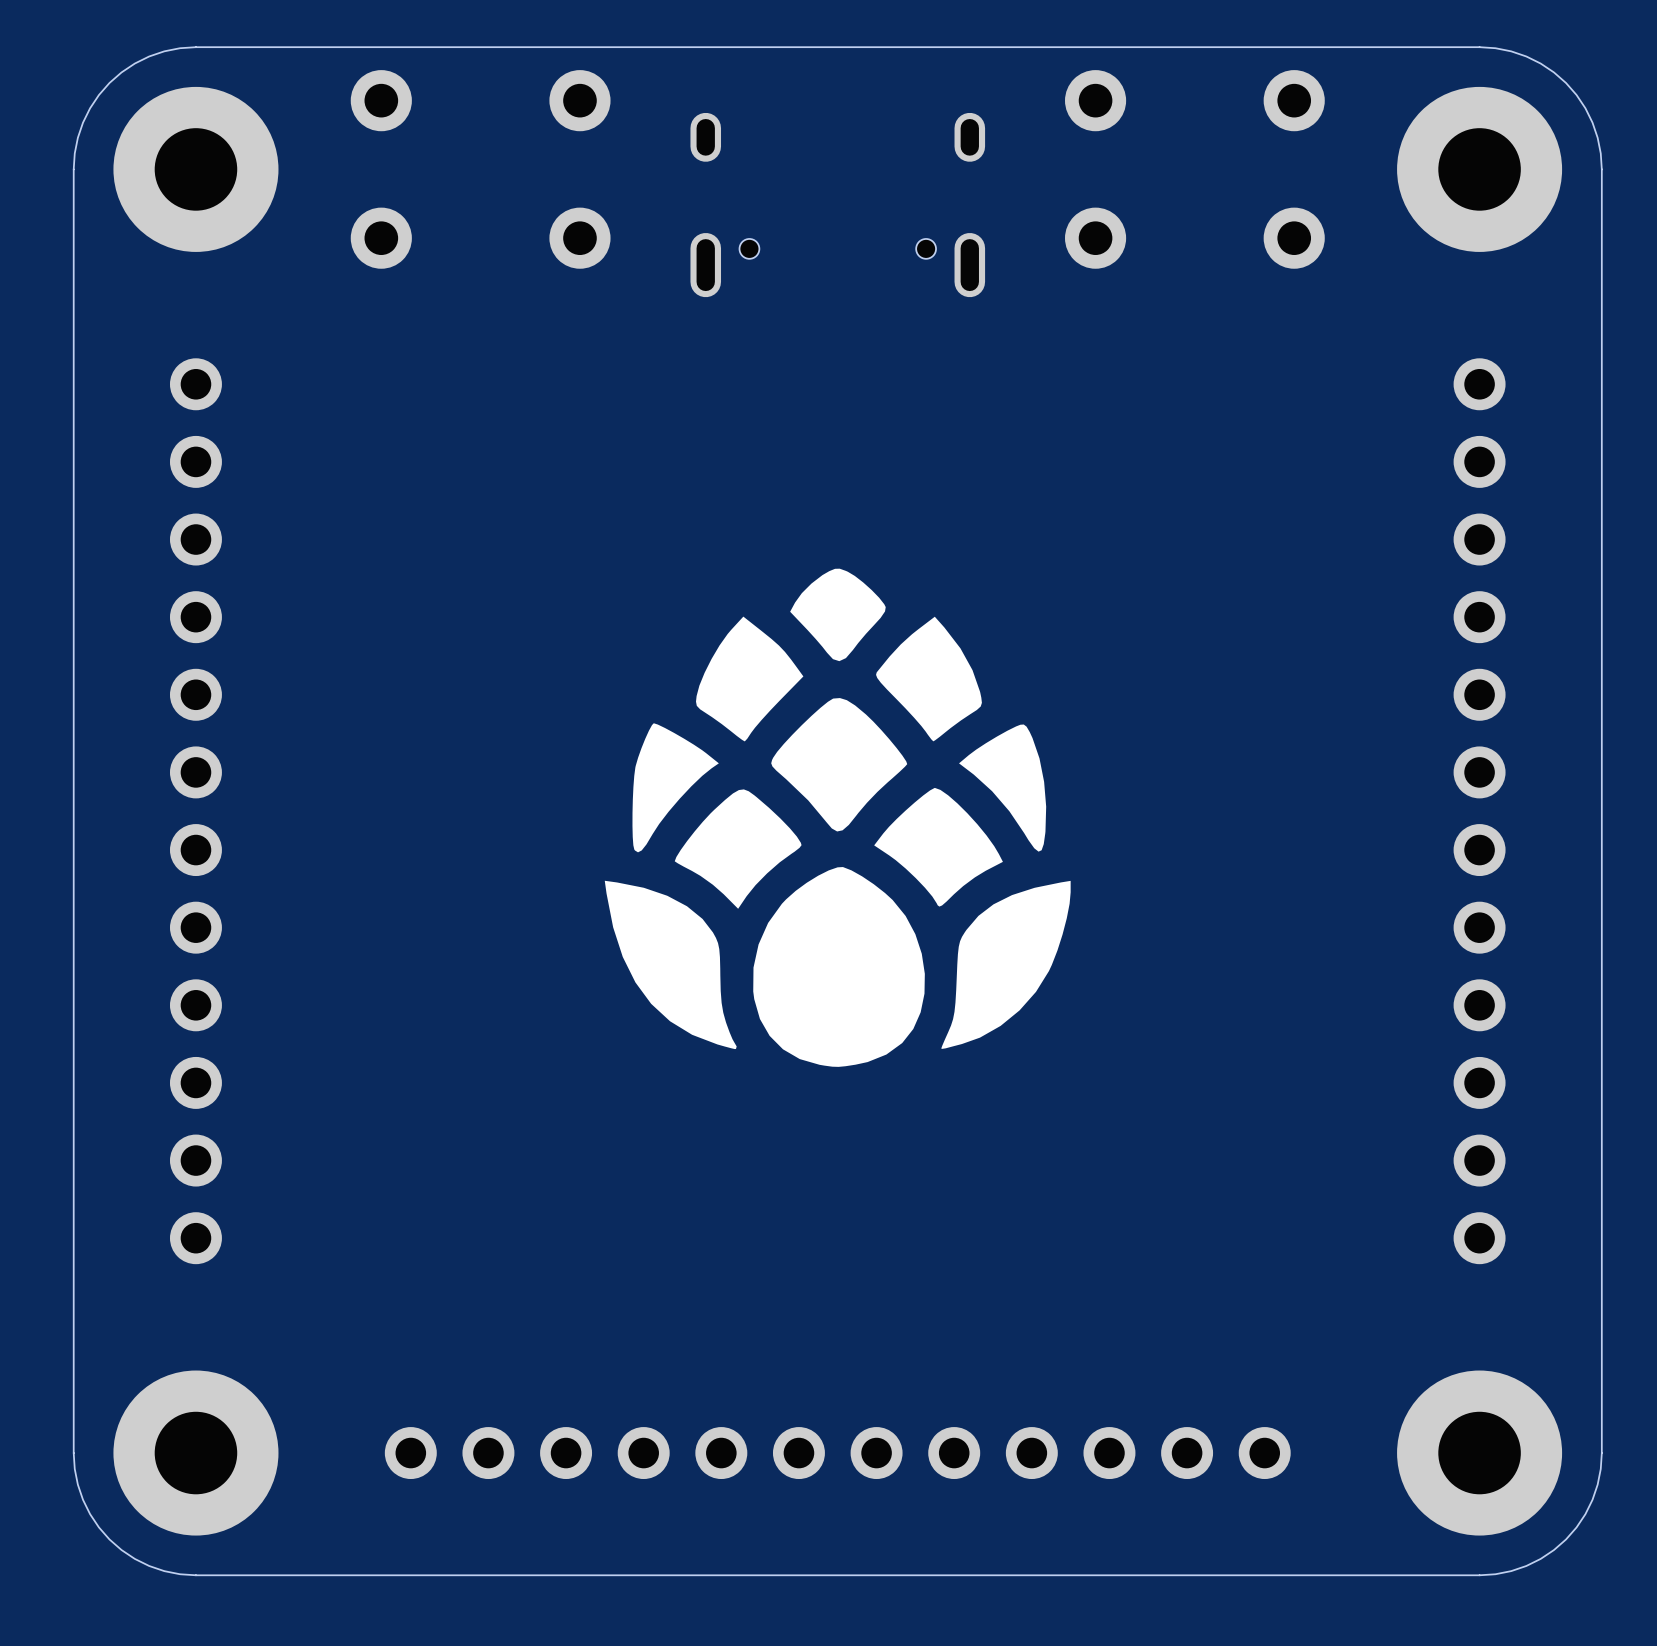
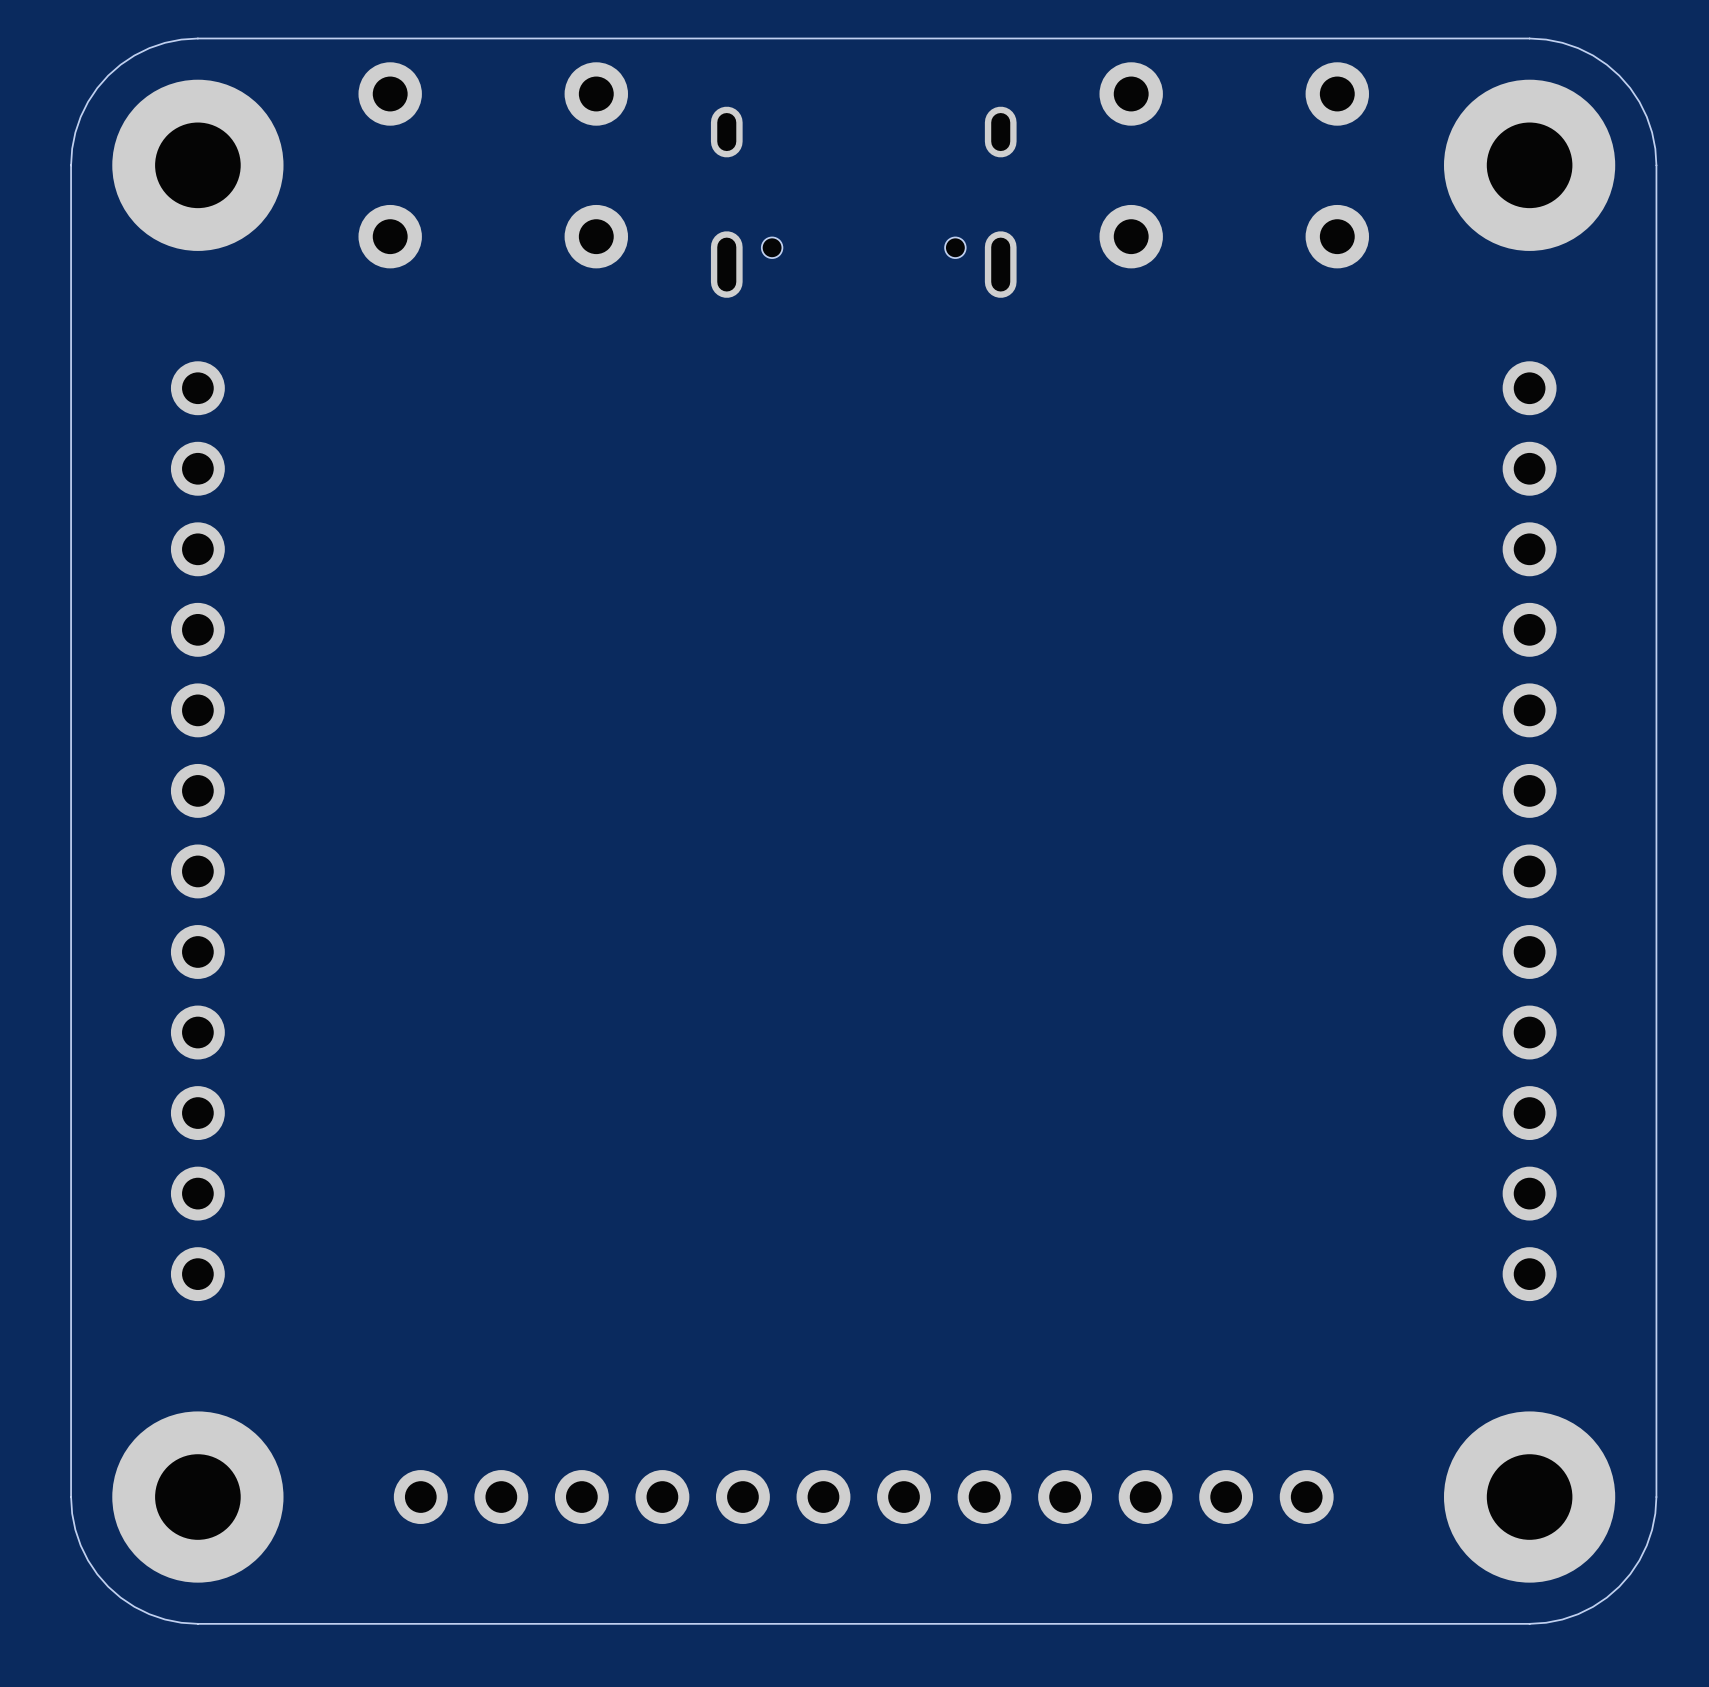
drawing: [604, 568, 1071, 1067] -> none

